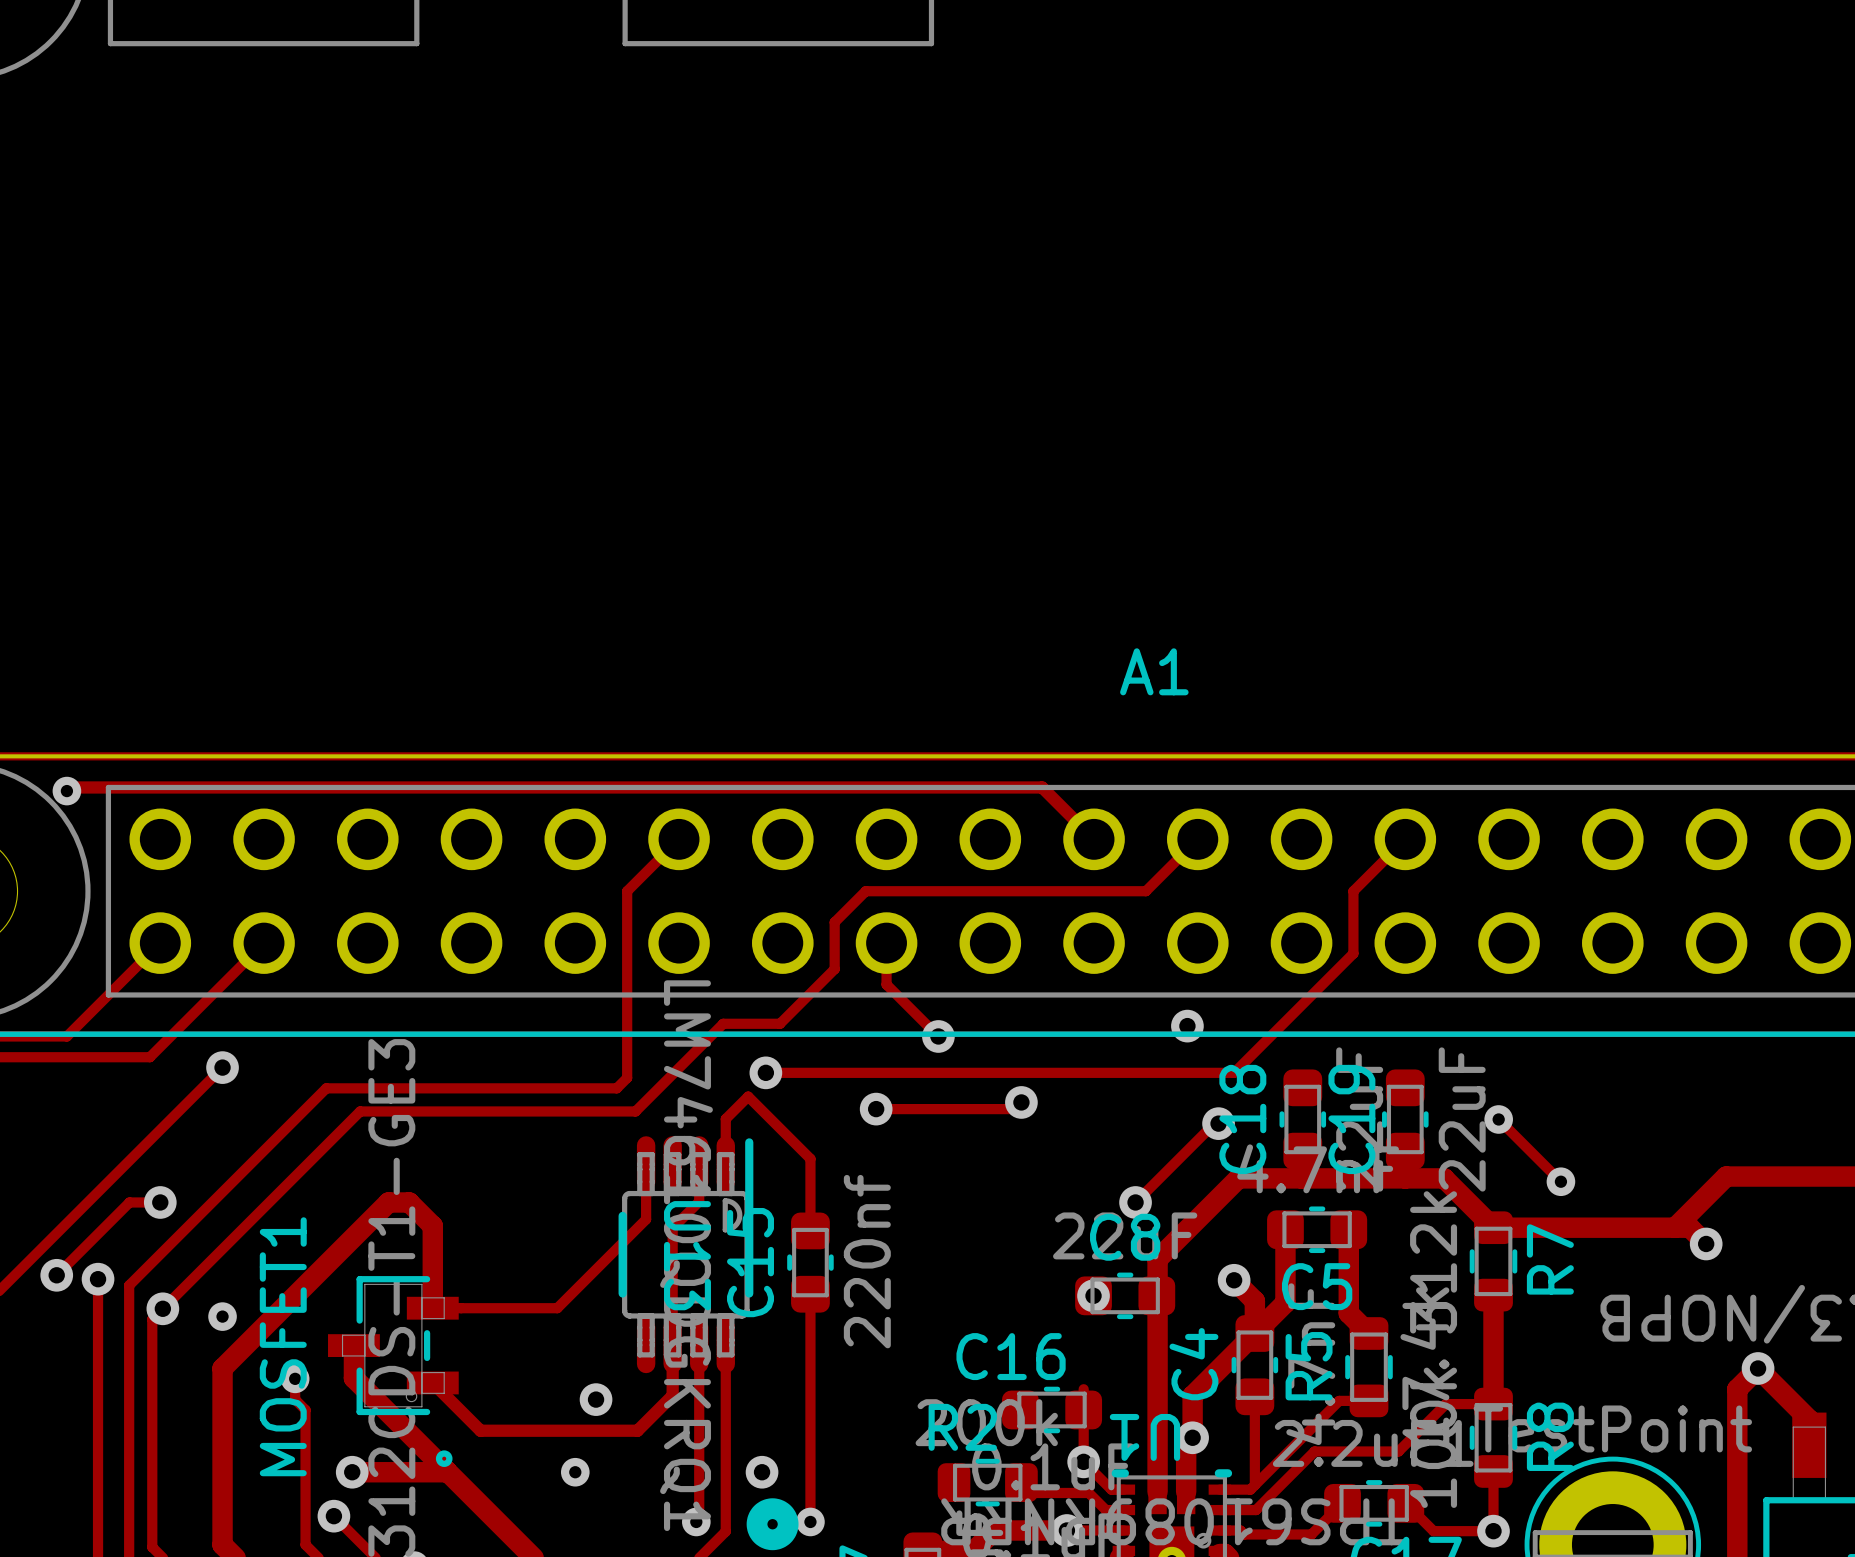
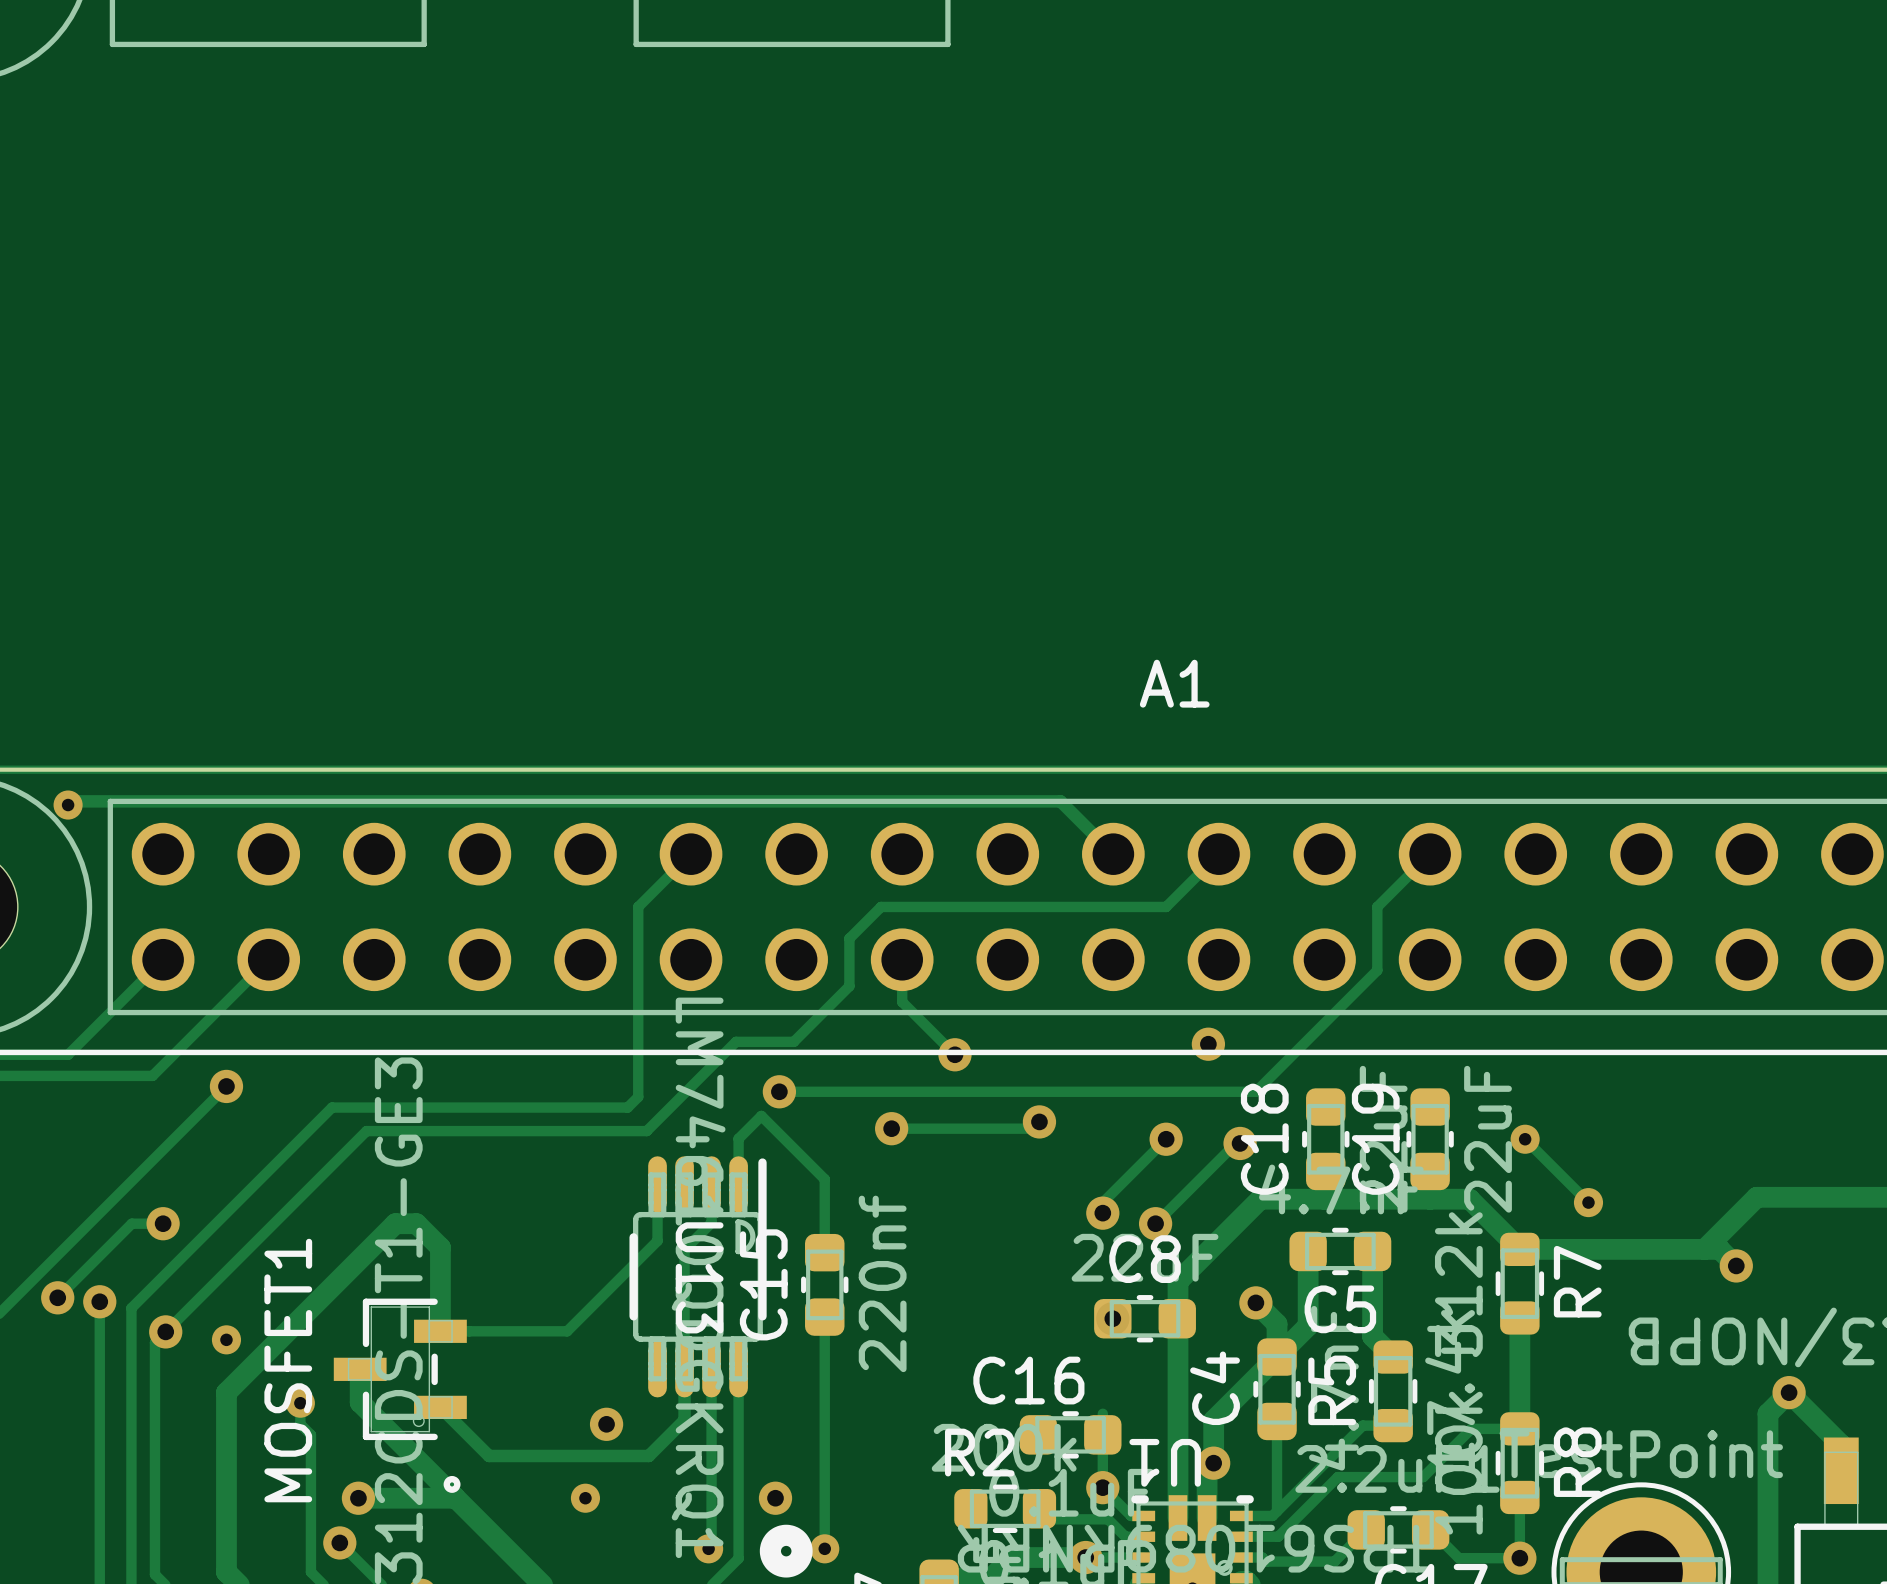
track: none -> (1166, 1139) (1102, 1202) (1102, 1213)
via: none -> (1166, 1139)
via: none -> (1102, 1213)

